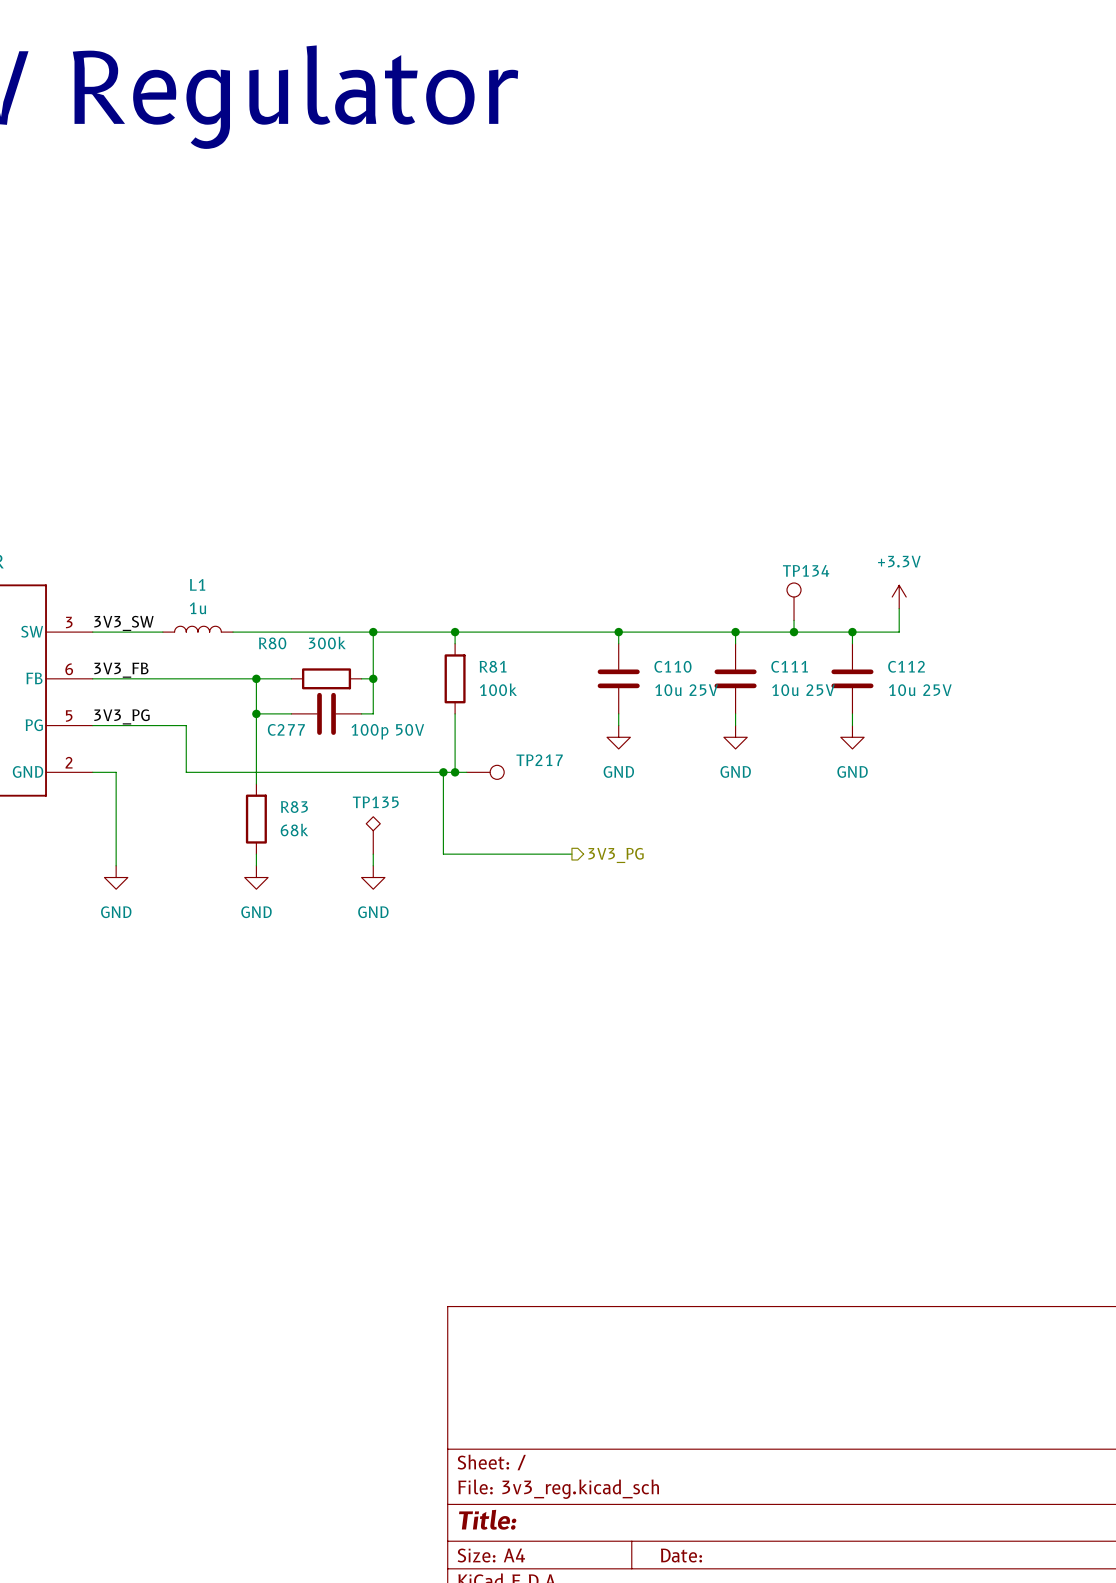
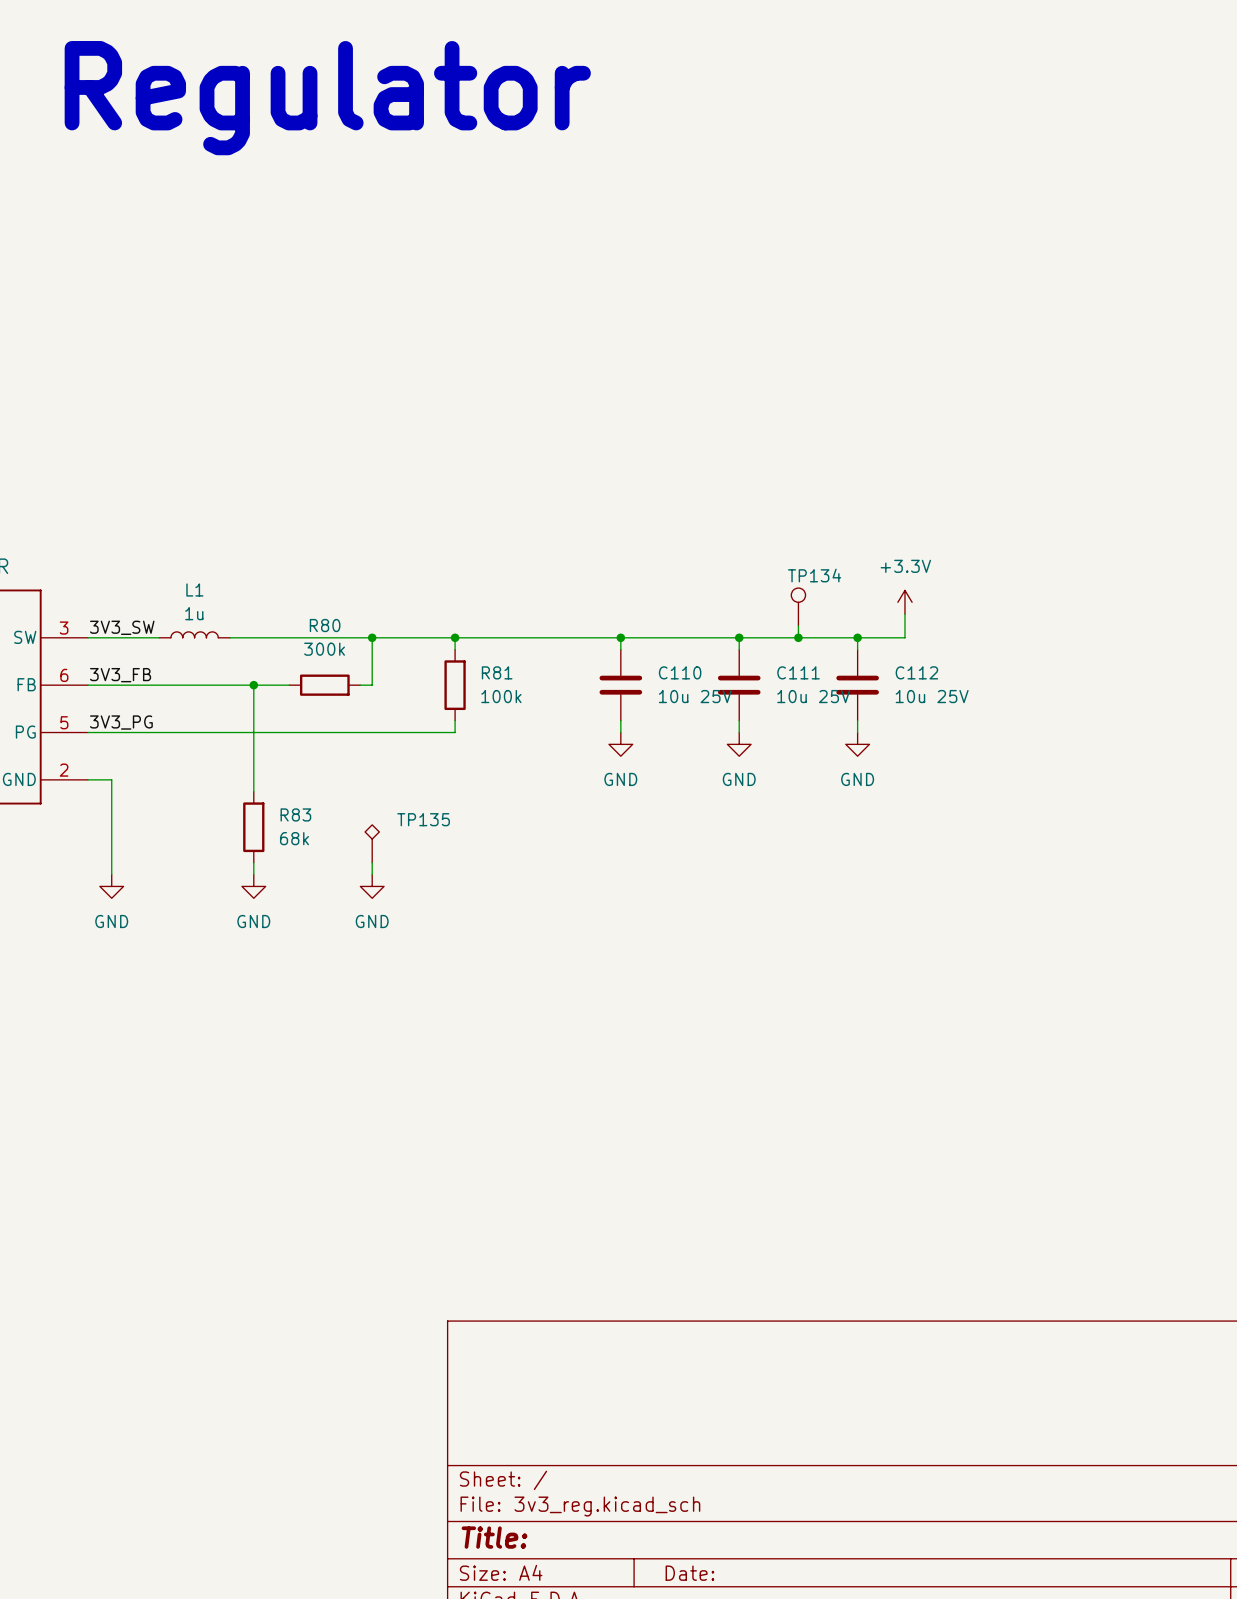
R80 name position: R80 (272, 643) -> R80 (325, 625)
wire: (373, 678) (373, 713) (361, 713) -> none
junction: (373, 678) -> none
wire: (256, 713) (291, 713) -> none
junction: (256, 713) -> none
C277: 100p 50V (326, 713) -> none
wire: (186, 725) (186, 772) (466, 772) -> (182, 732) (455, 732)
wire: (455, 725) (455, 772) -> none
wire: (443, 772) (443, 854) (571, 854) -> none
junction: (443, 772) -> none
junction: (455, 772) -> none
TP217: (485, 772) -> none
TP135 name position: TP135 (375, 802) -> TP135 (423, 819)
hierarchical label: 3V3_PG (616, 855) -> none

